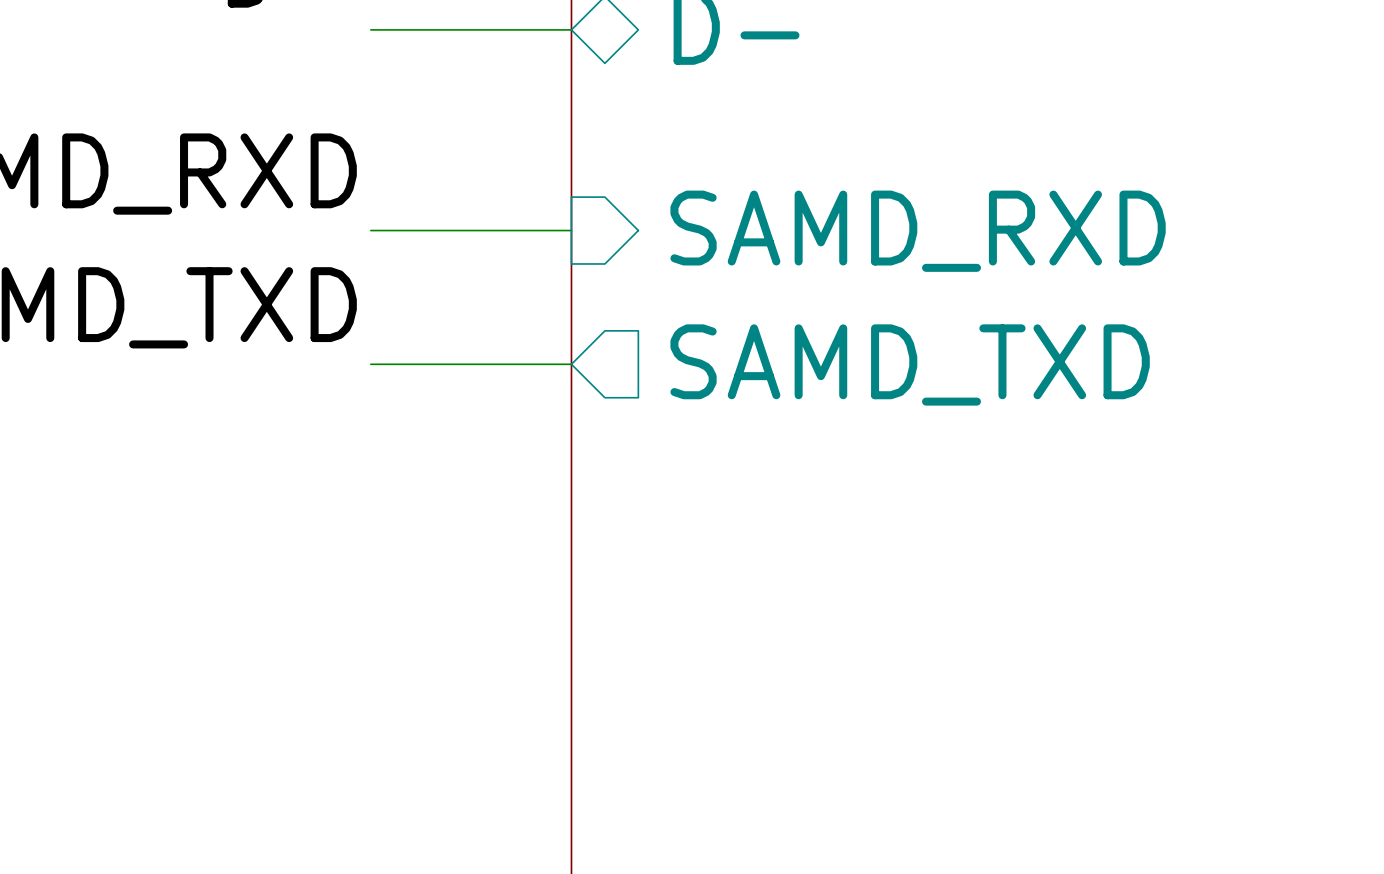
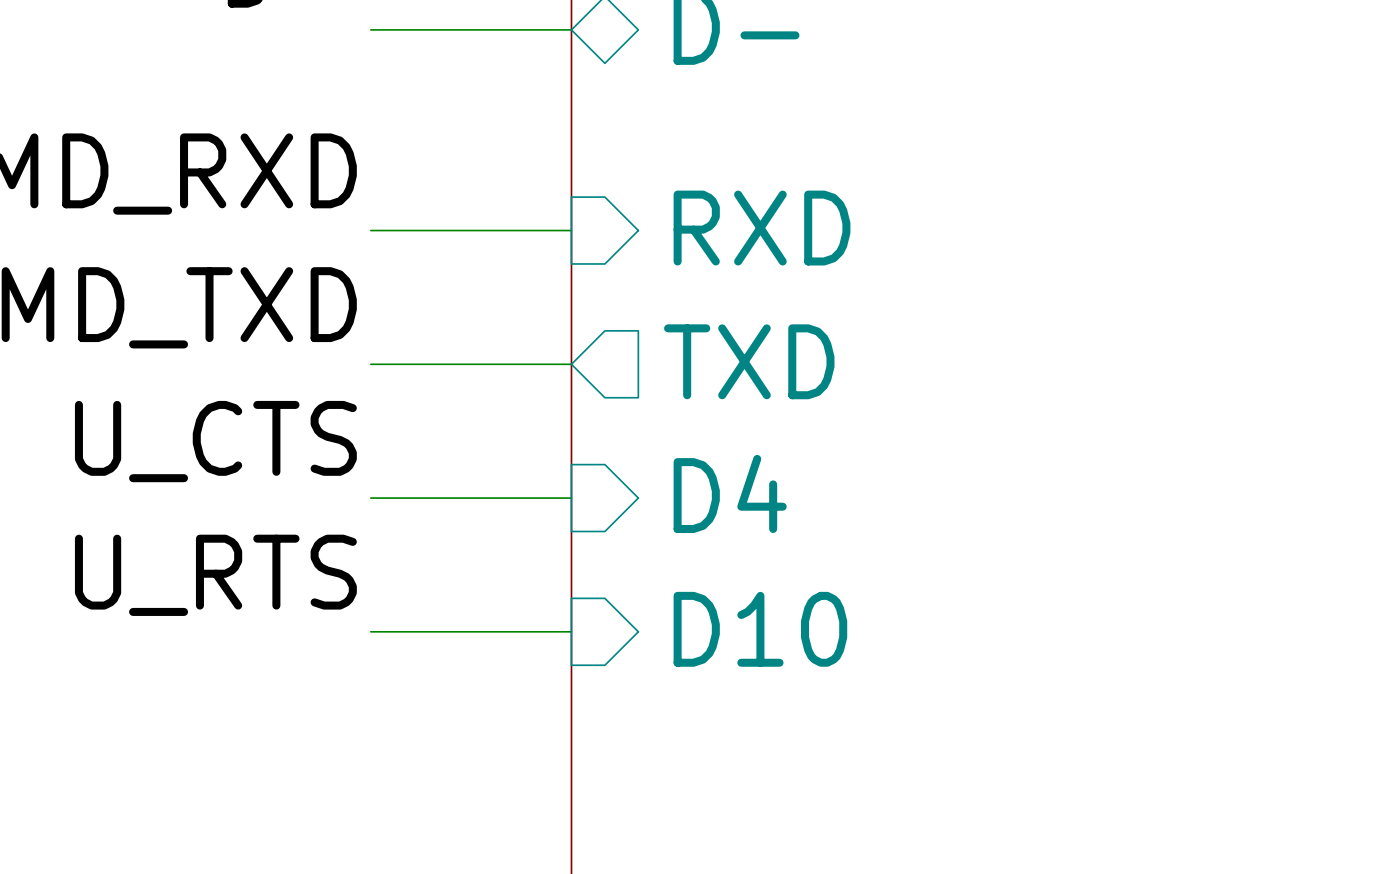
sheet pin: SAMD_RXD (918, 231) -> RXD (762, 228)
sheet pin: SAMD_TXD (910, 364) -> TXD (749, 361)
label: none -> U_CTS (215, 441)
sheet pin: none -> D4 (730, 493)
wire: none -> (370, 498) (571, 498)
label: none -> U_RTS (215, 575)
sheet pin: none -> D10 (760, 629)
wire: none -> (370, 631) (571, 631)

